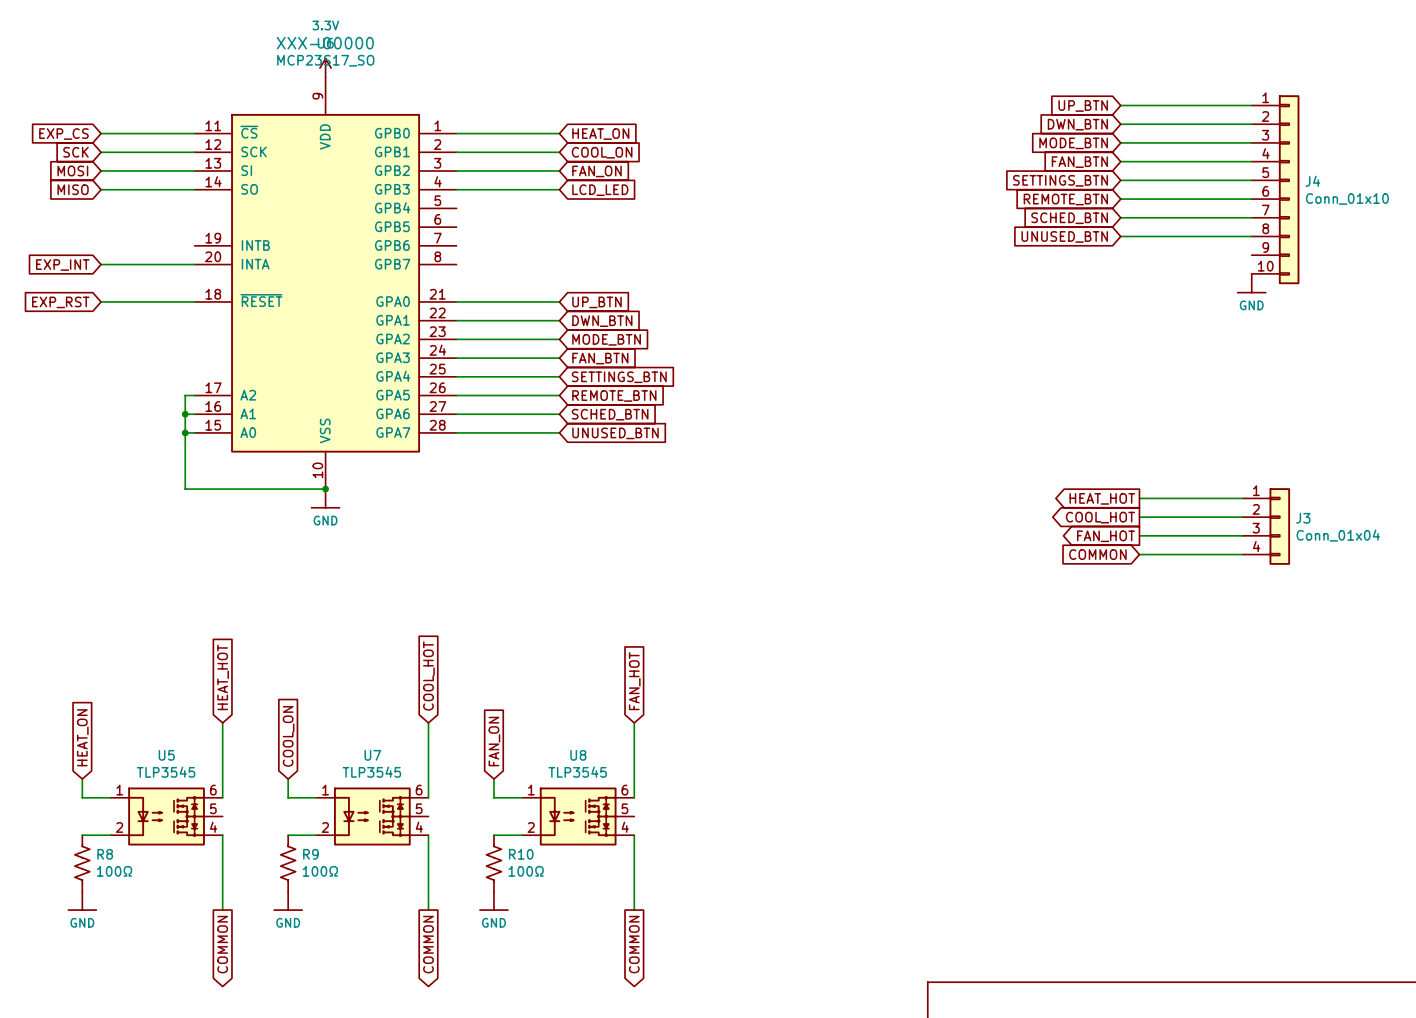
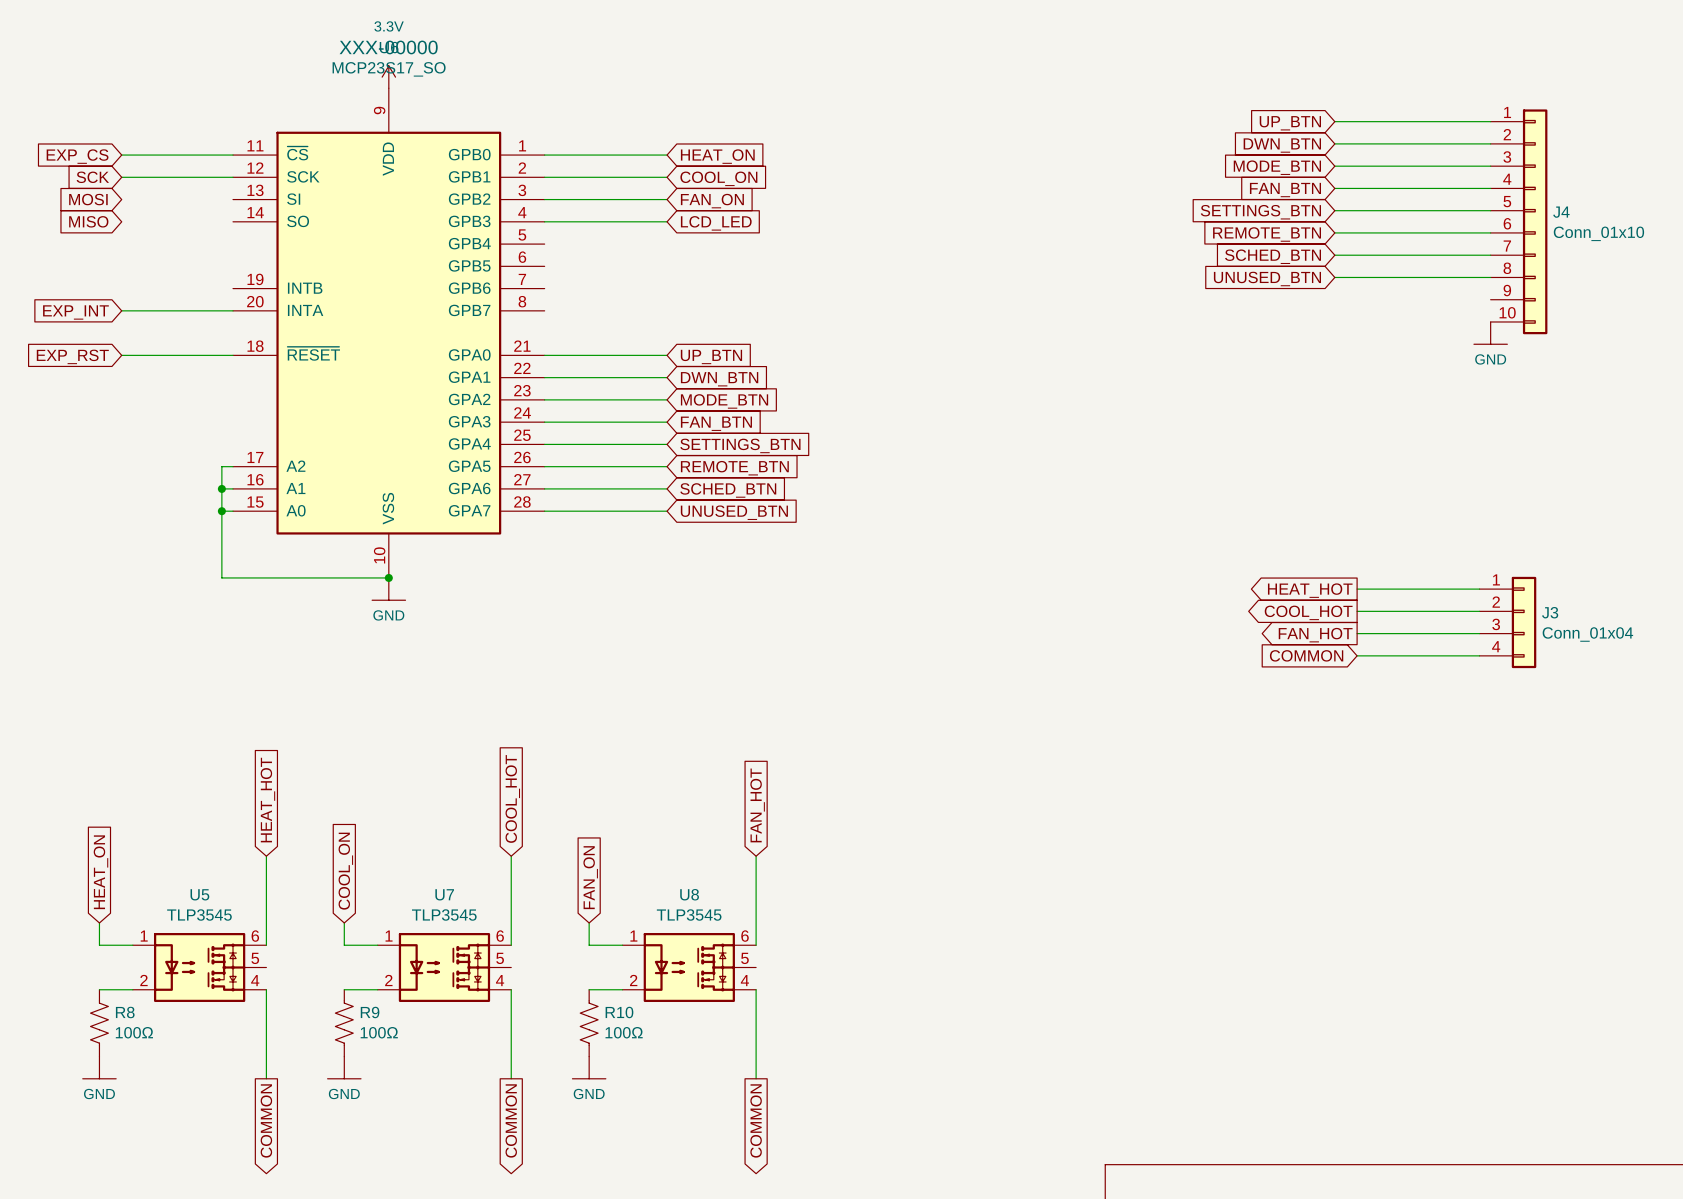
wire: (101, 171) (194, 171) -> none
wire: (101, 189) (194, 189) -> none

